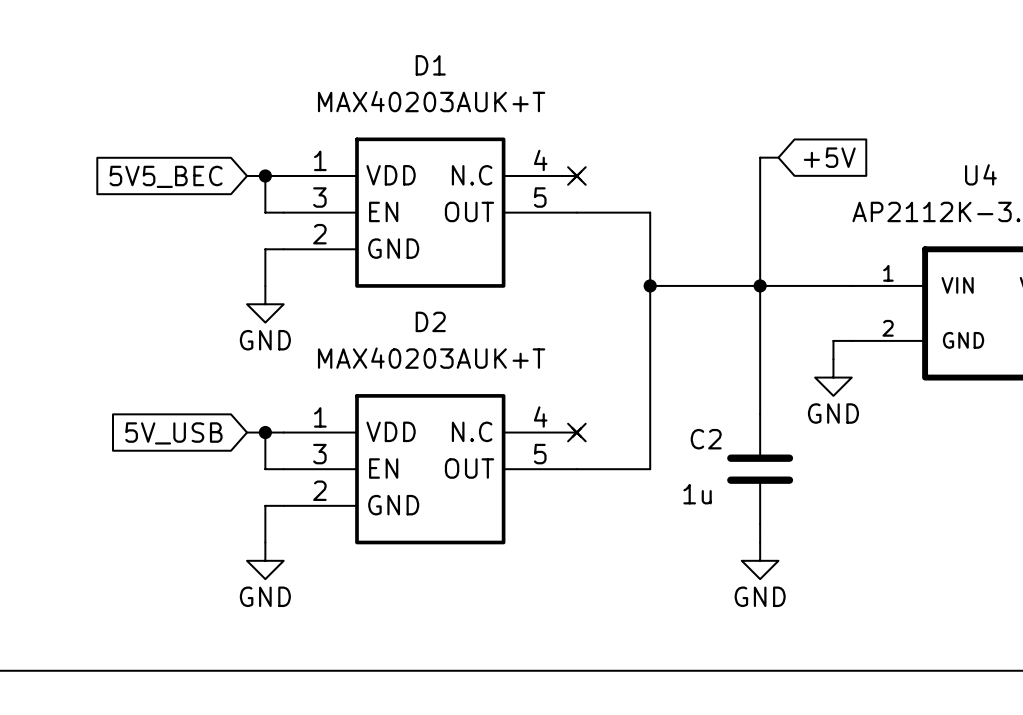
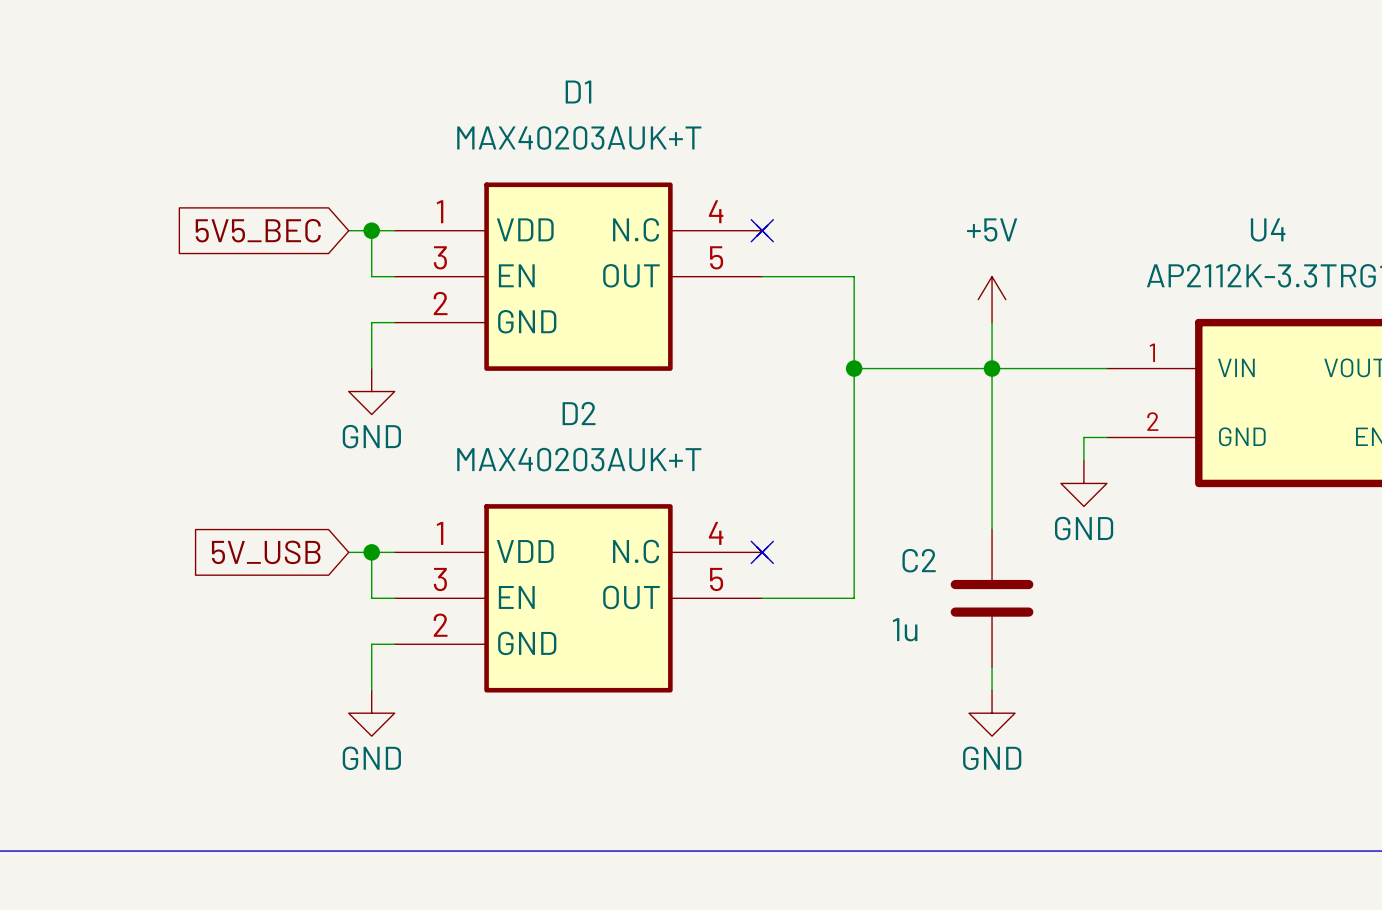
wire: (778, 157) (760, 157) (760, 249) -> none
global label: +5V (829, 157) -> none
power symbol: none -> +5V (992, 299)

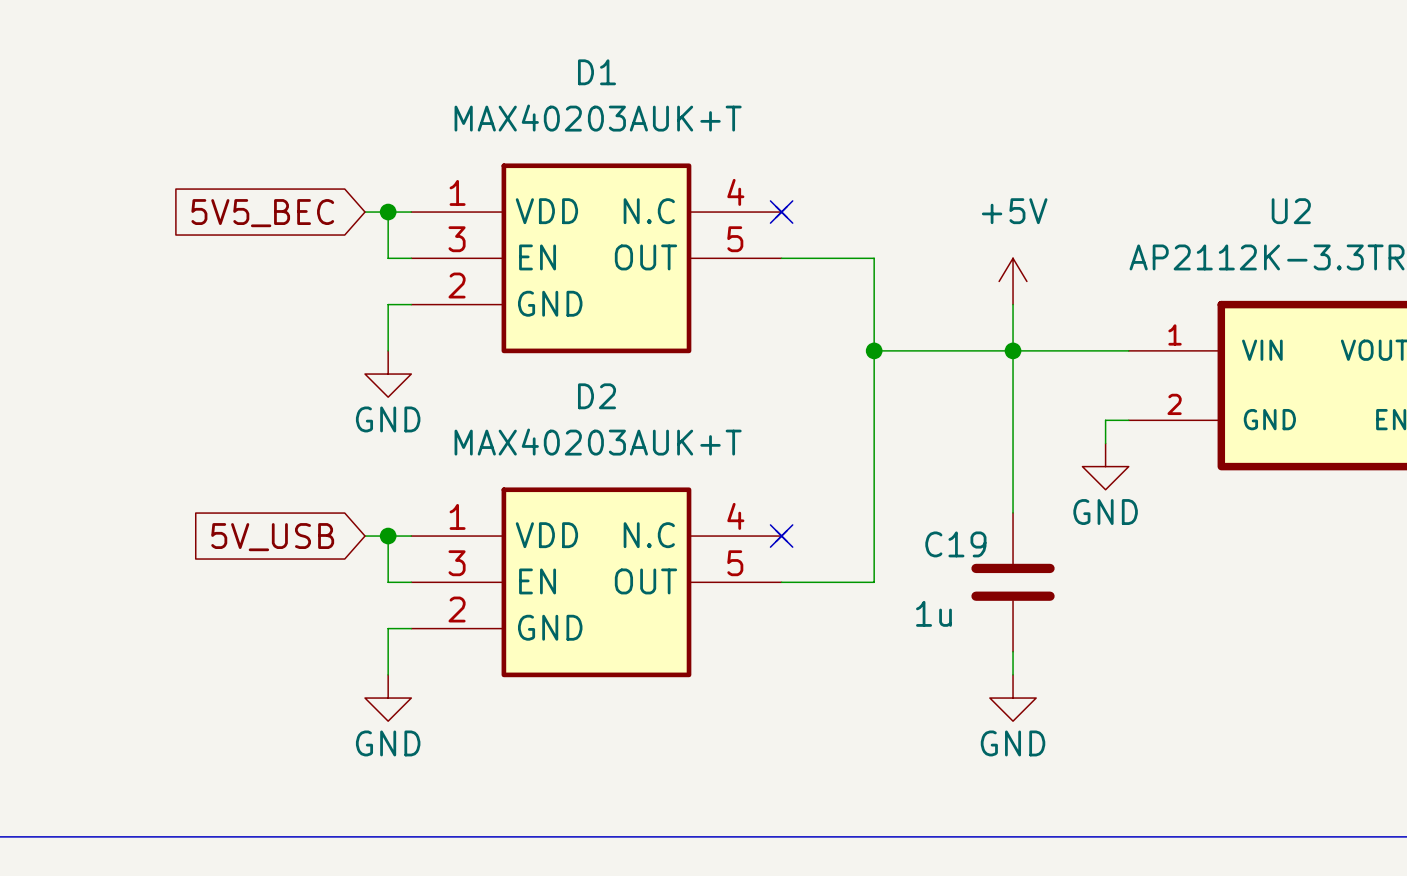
U4 name: U4 (1268, 229) -> U2 (1291, 211)
C2 name: C2 (919, 560) -> C19 (955, 544)

